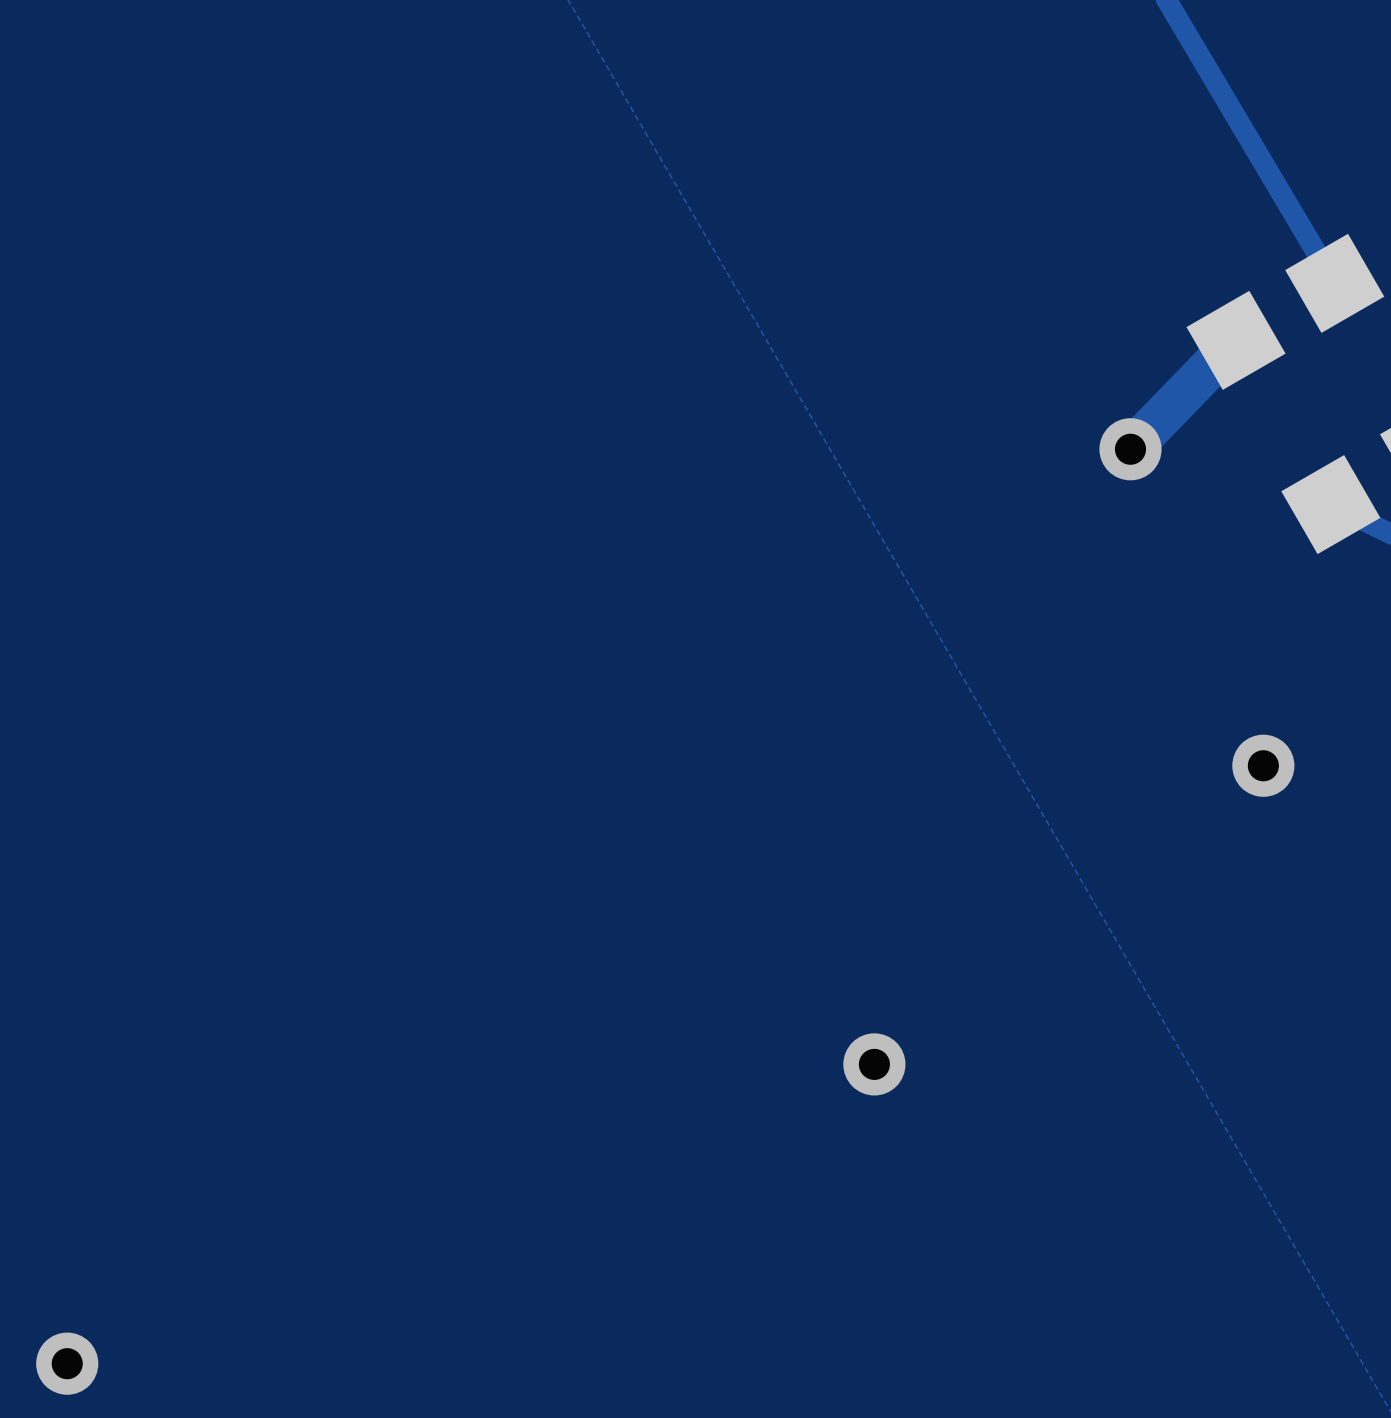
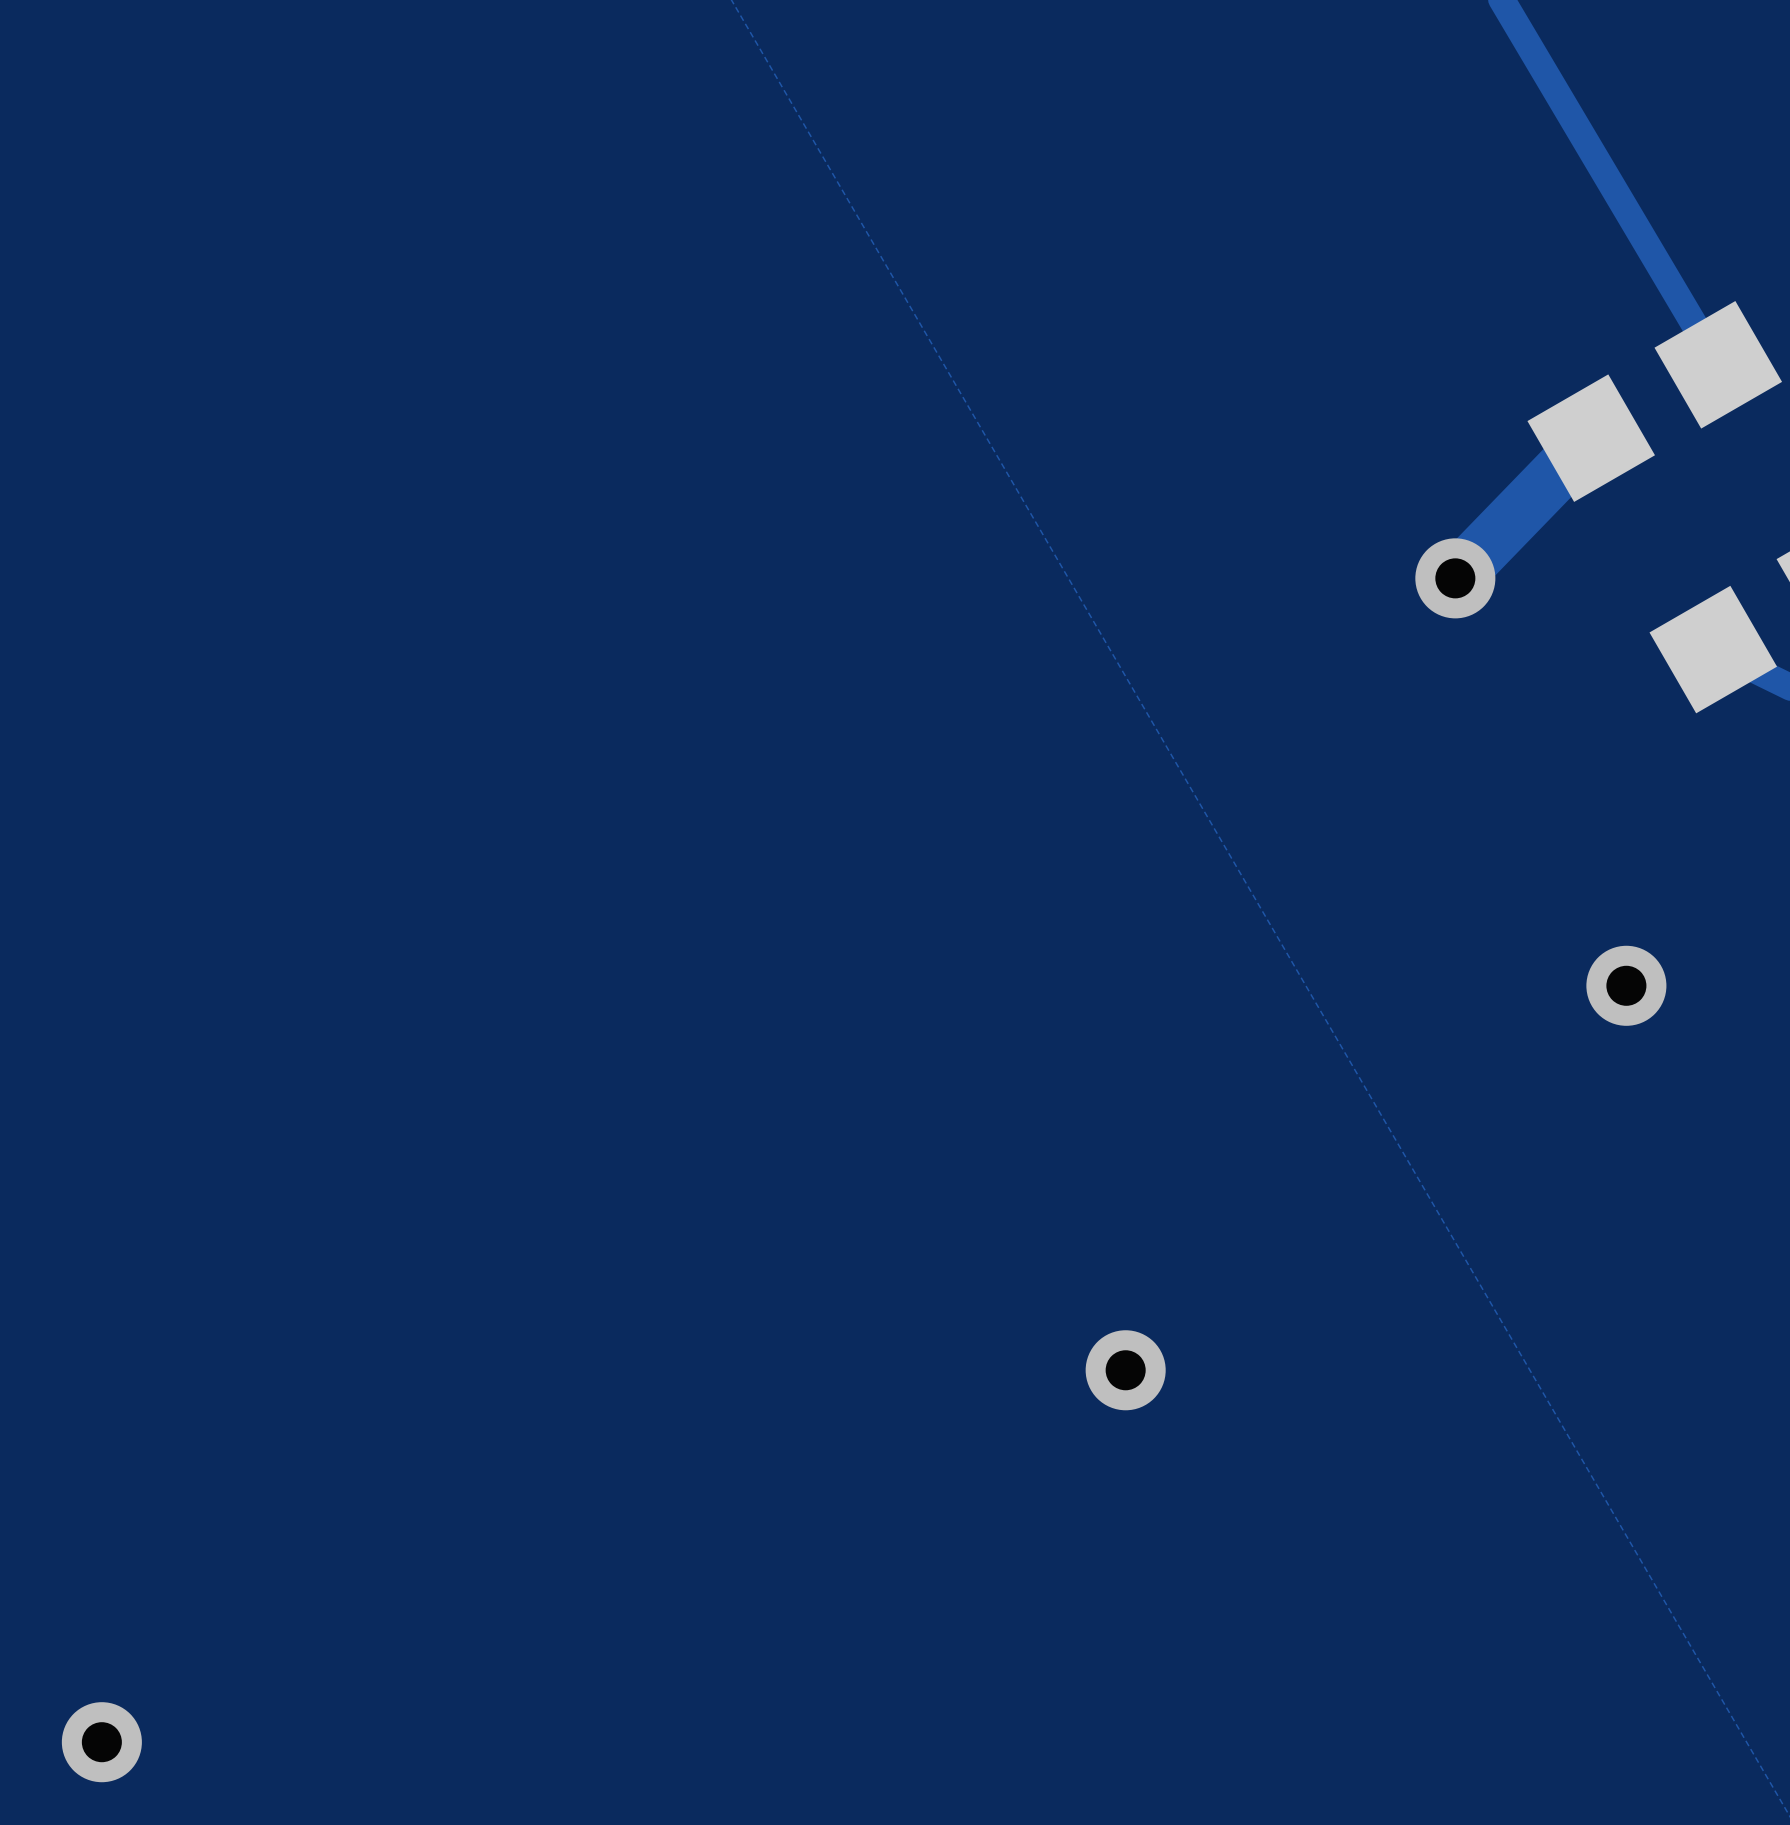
via position: (67, 1363) -> (101, 1742)

